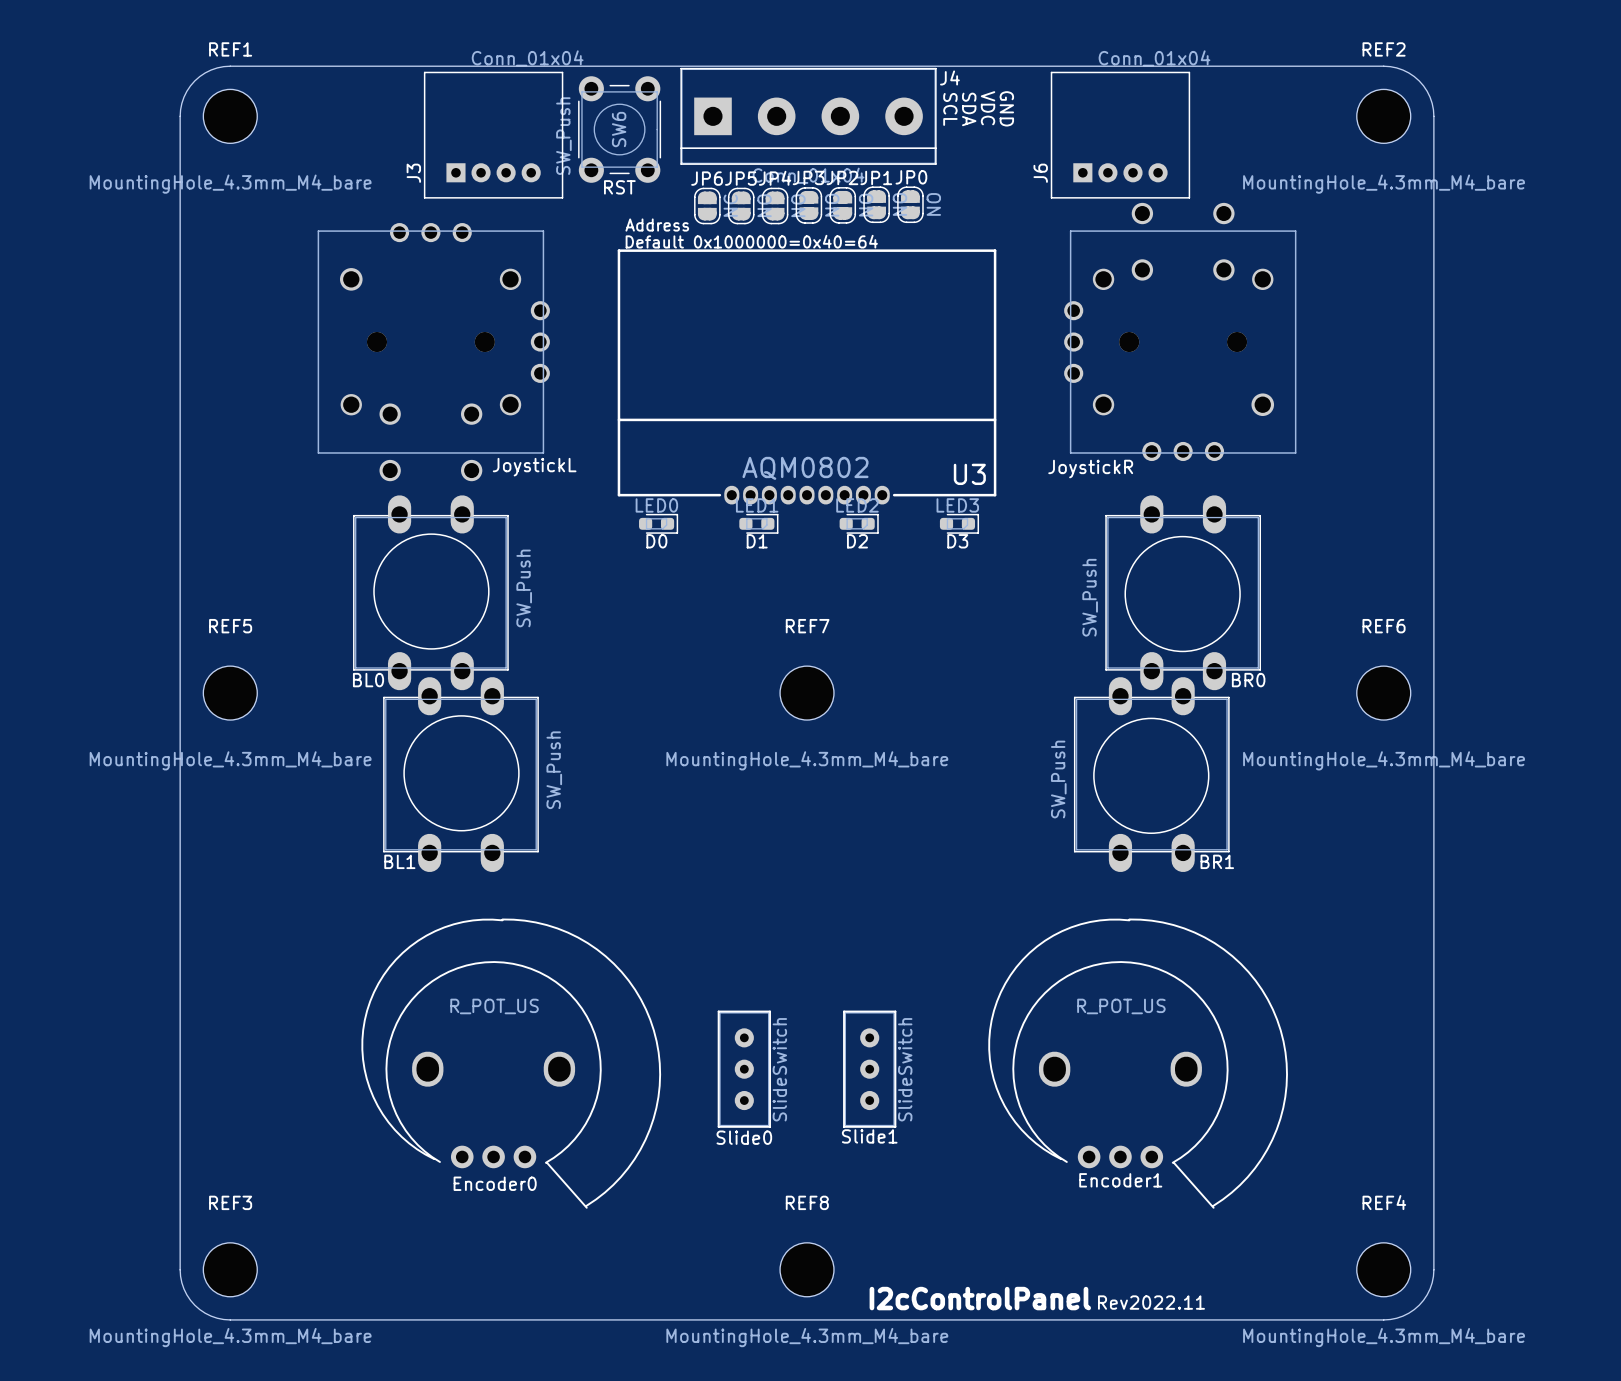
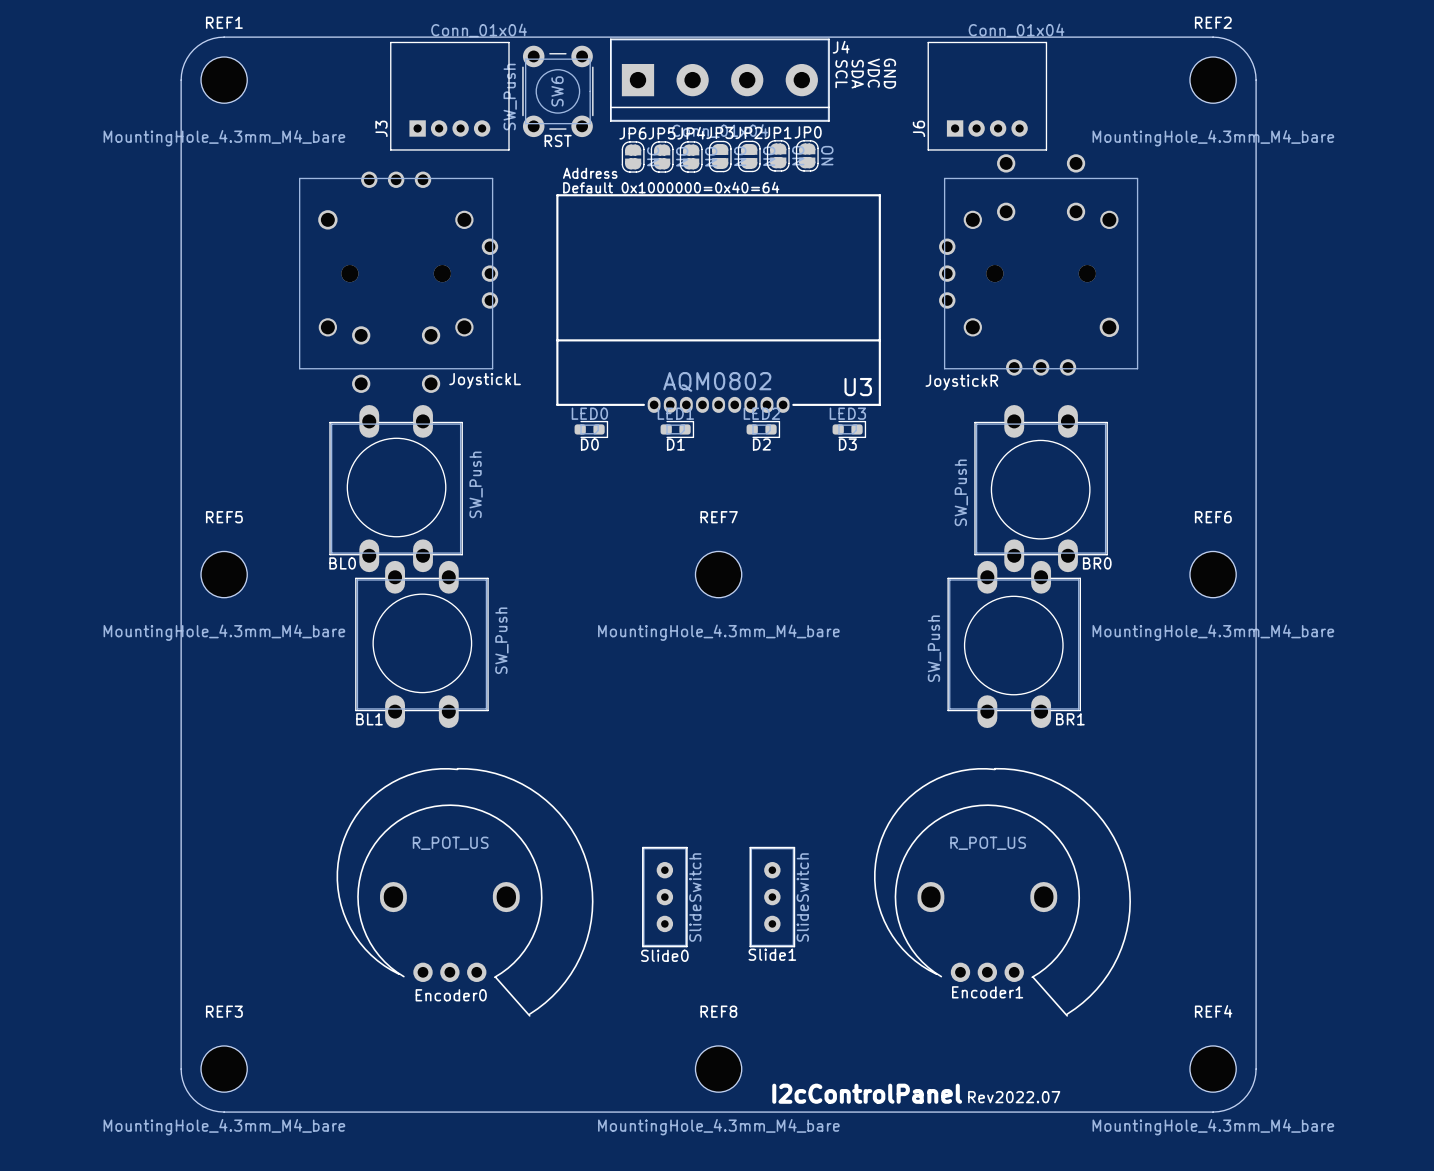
text: Rev2022.11 (1151, 1302) -> Rev2022.07 (1014, 1097)

